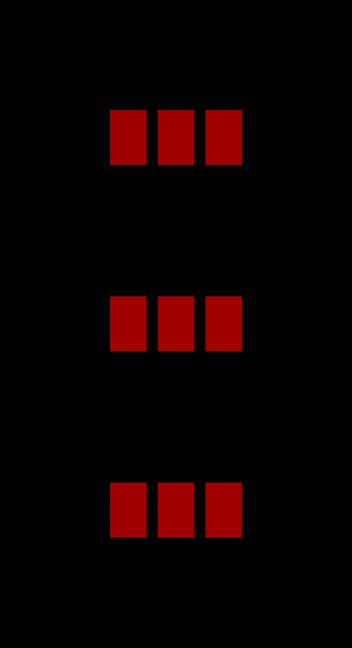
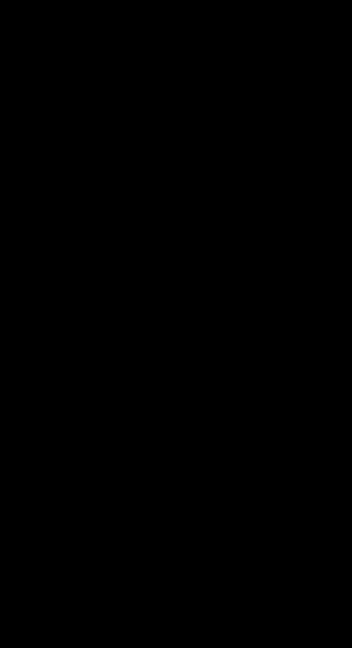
part: (176, 137) -> none
part: (176, 323) -> none
part: (176, 510) -> none

